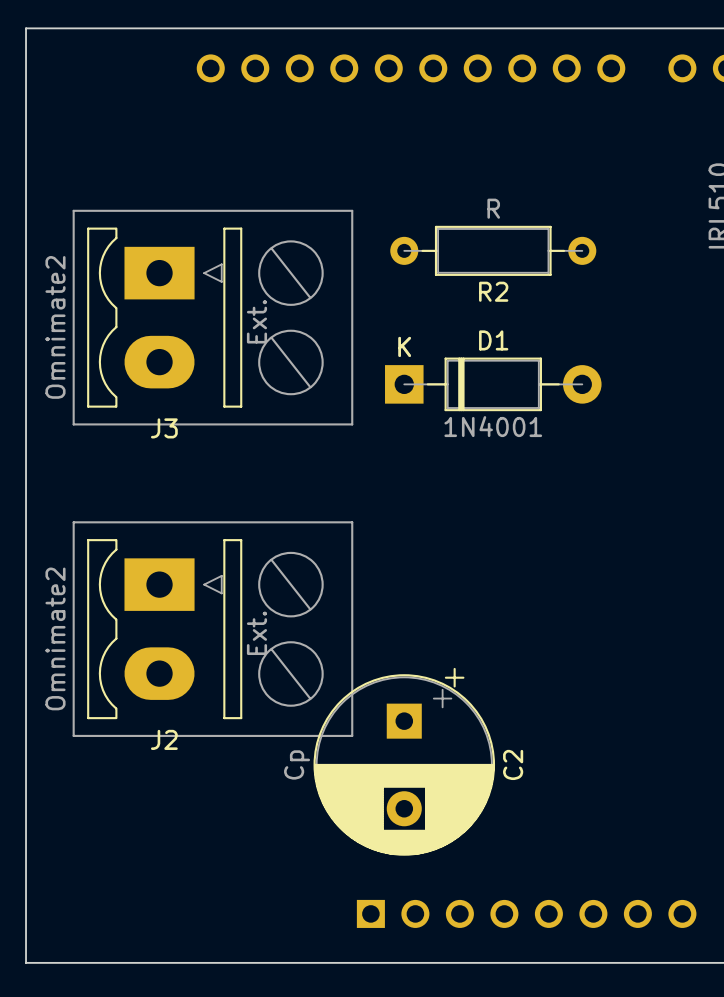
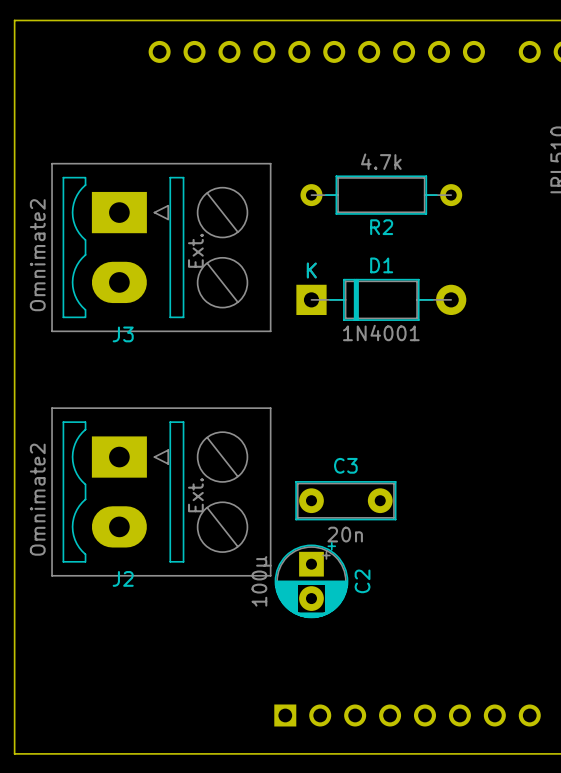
R2 value: R (493, 208) -> 4.7k (381, 161)
C3: none -> 20n (345, 500)
C2 footprint: [313, 667, 496, 856] -> [274, 541, 349, 619]
C2 value: Cp (297, 764) -> 100µ (261, 581)
C2 name position: C2 (513, 764) -> C2 (362, 581)

